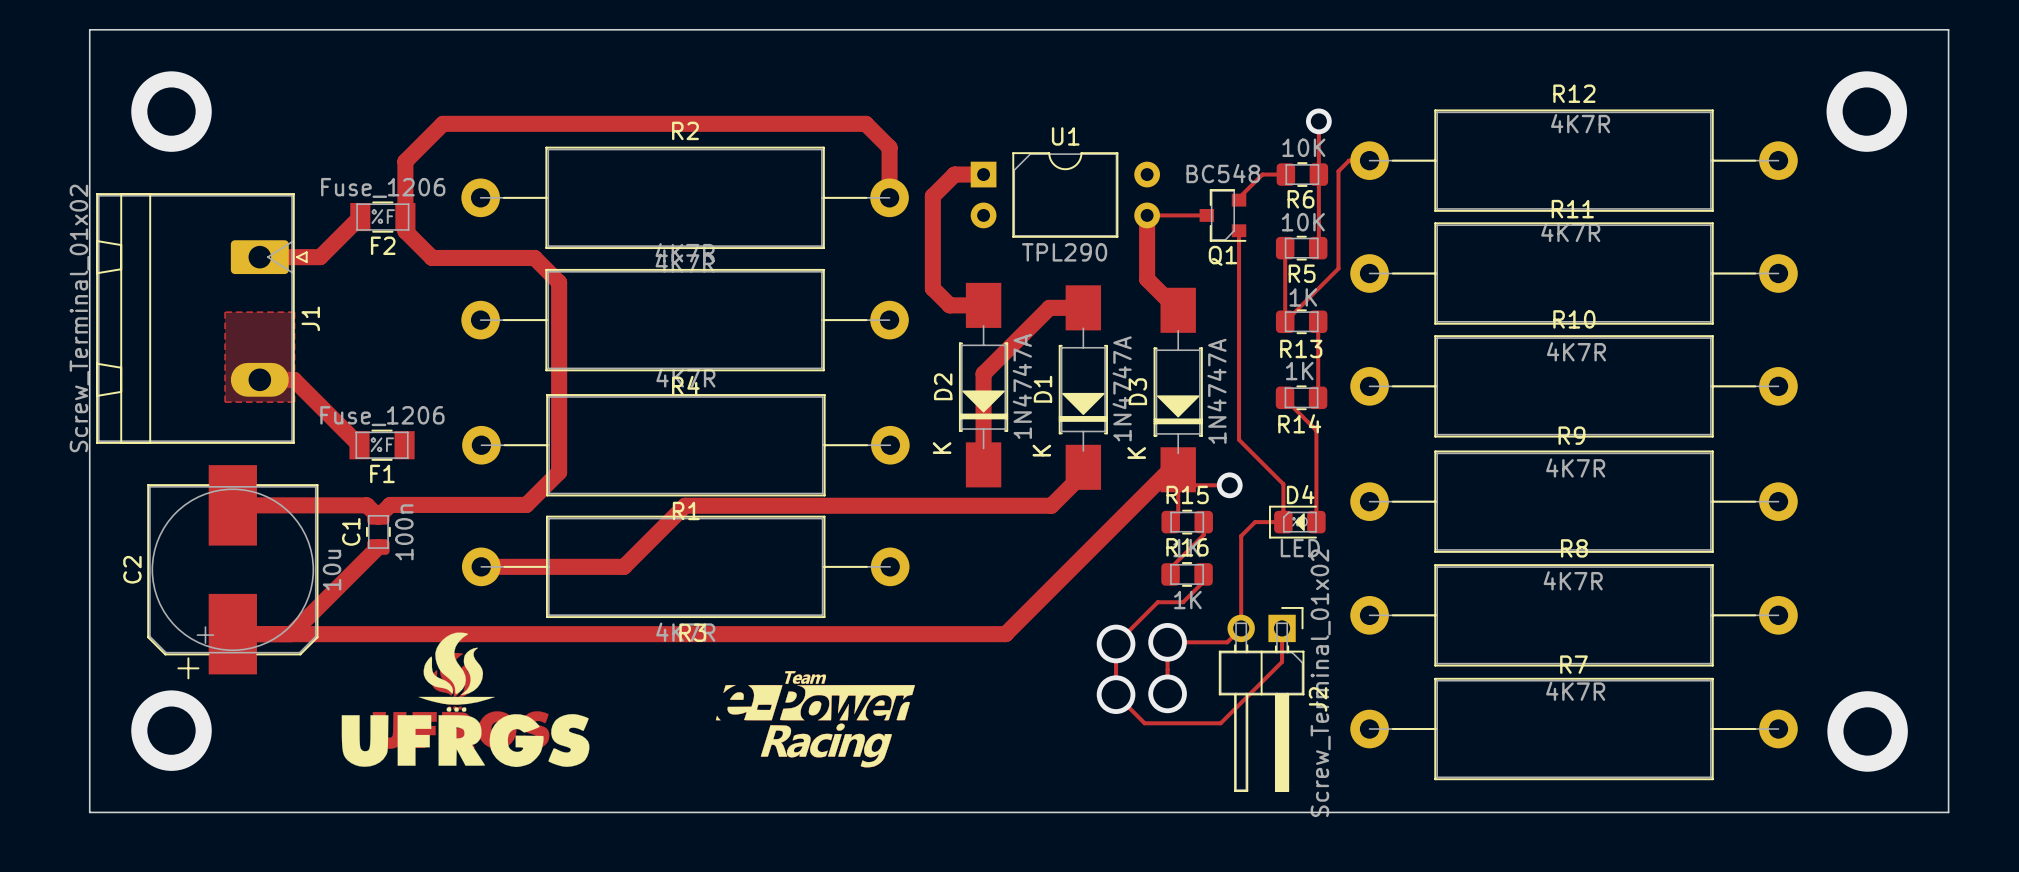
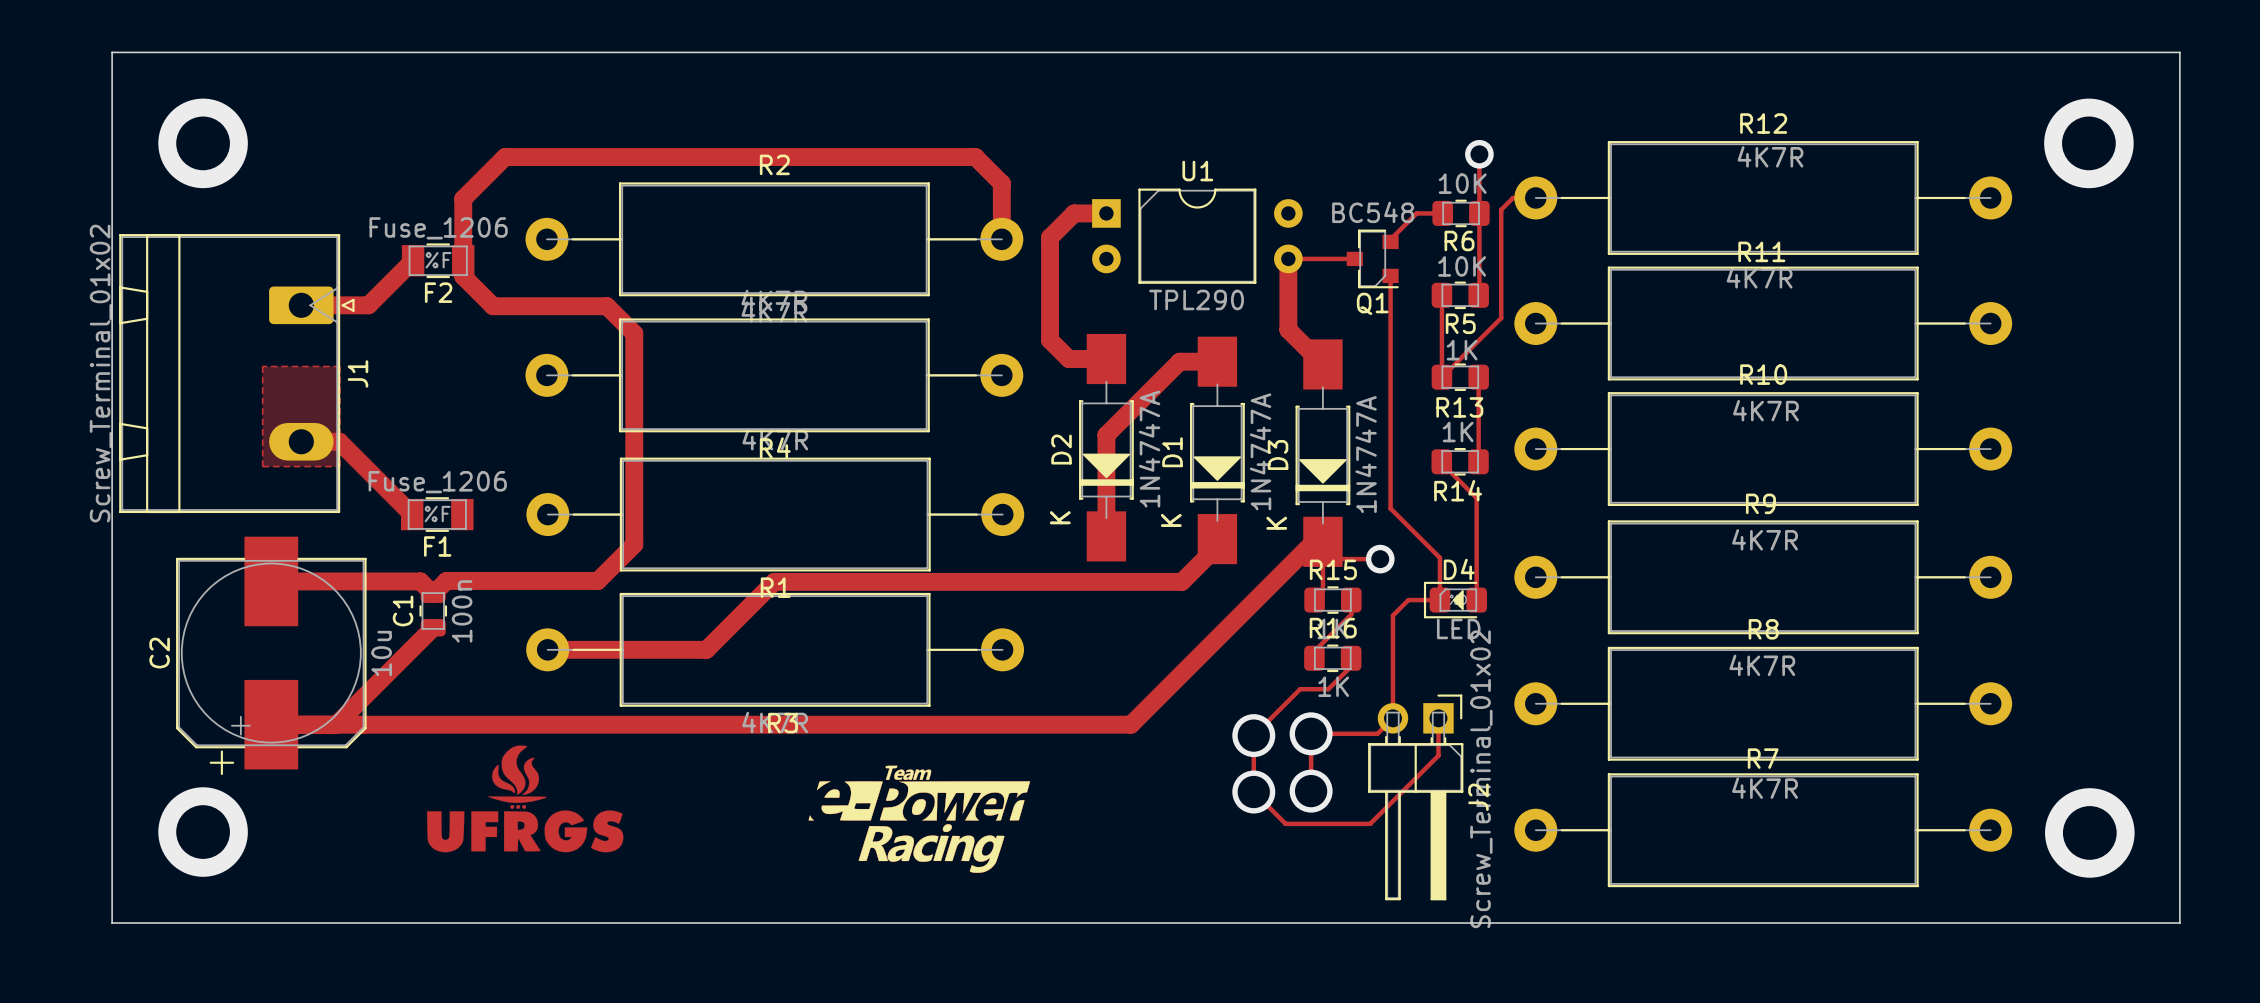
drawing: [341, 632, 590, 768] -> none

